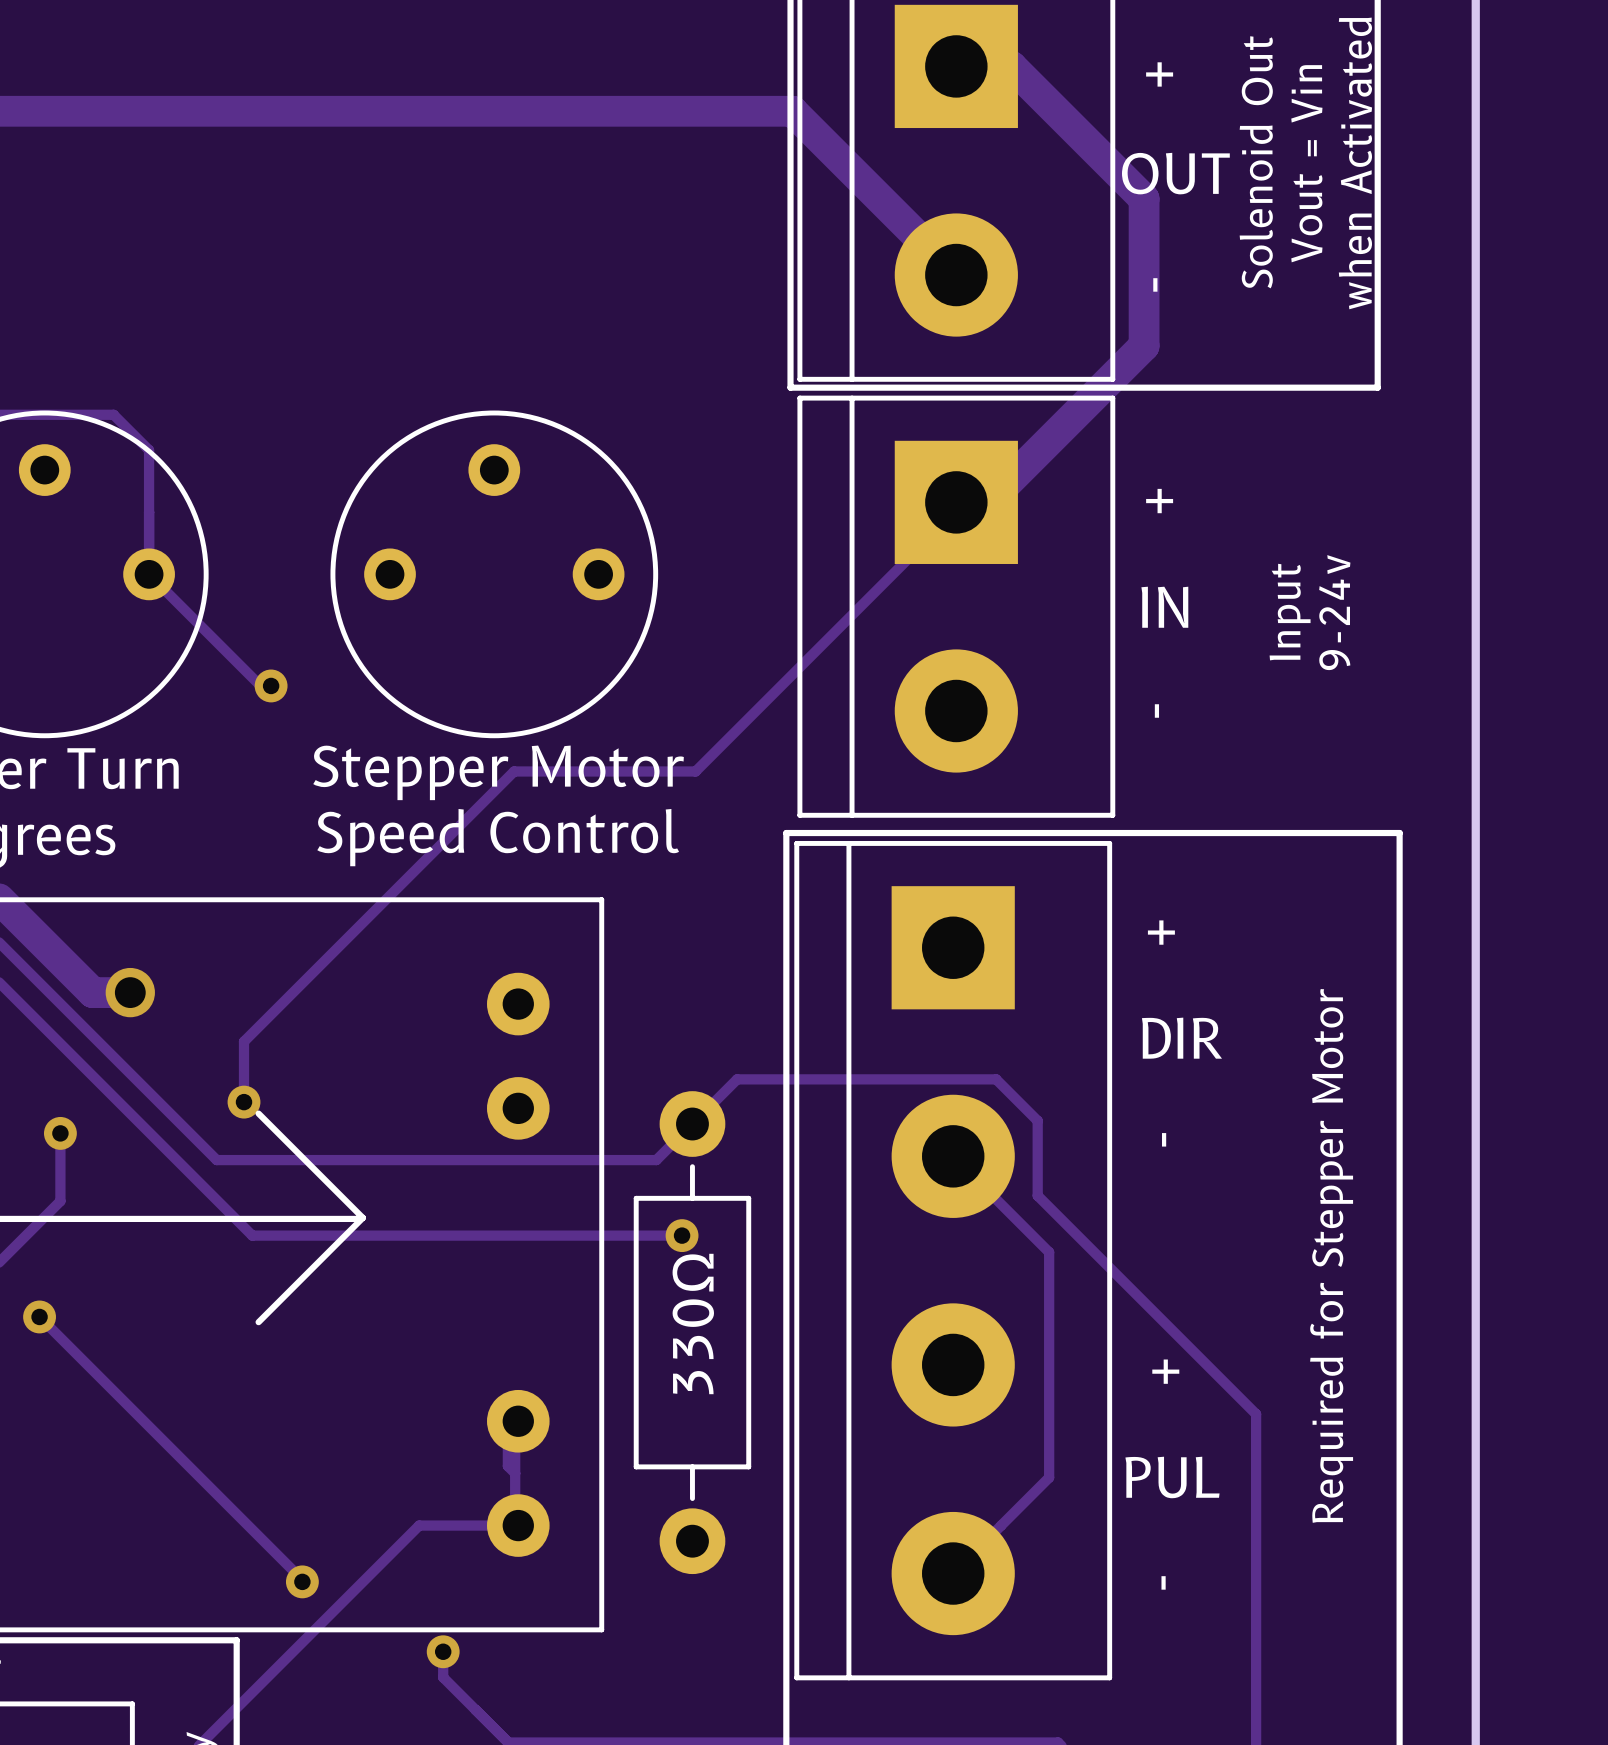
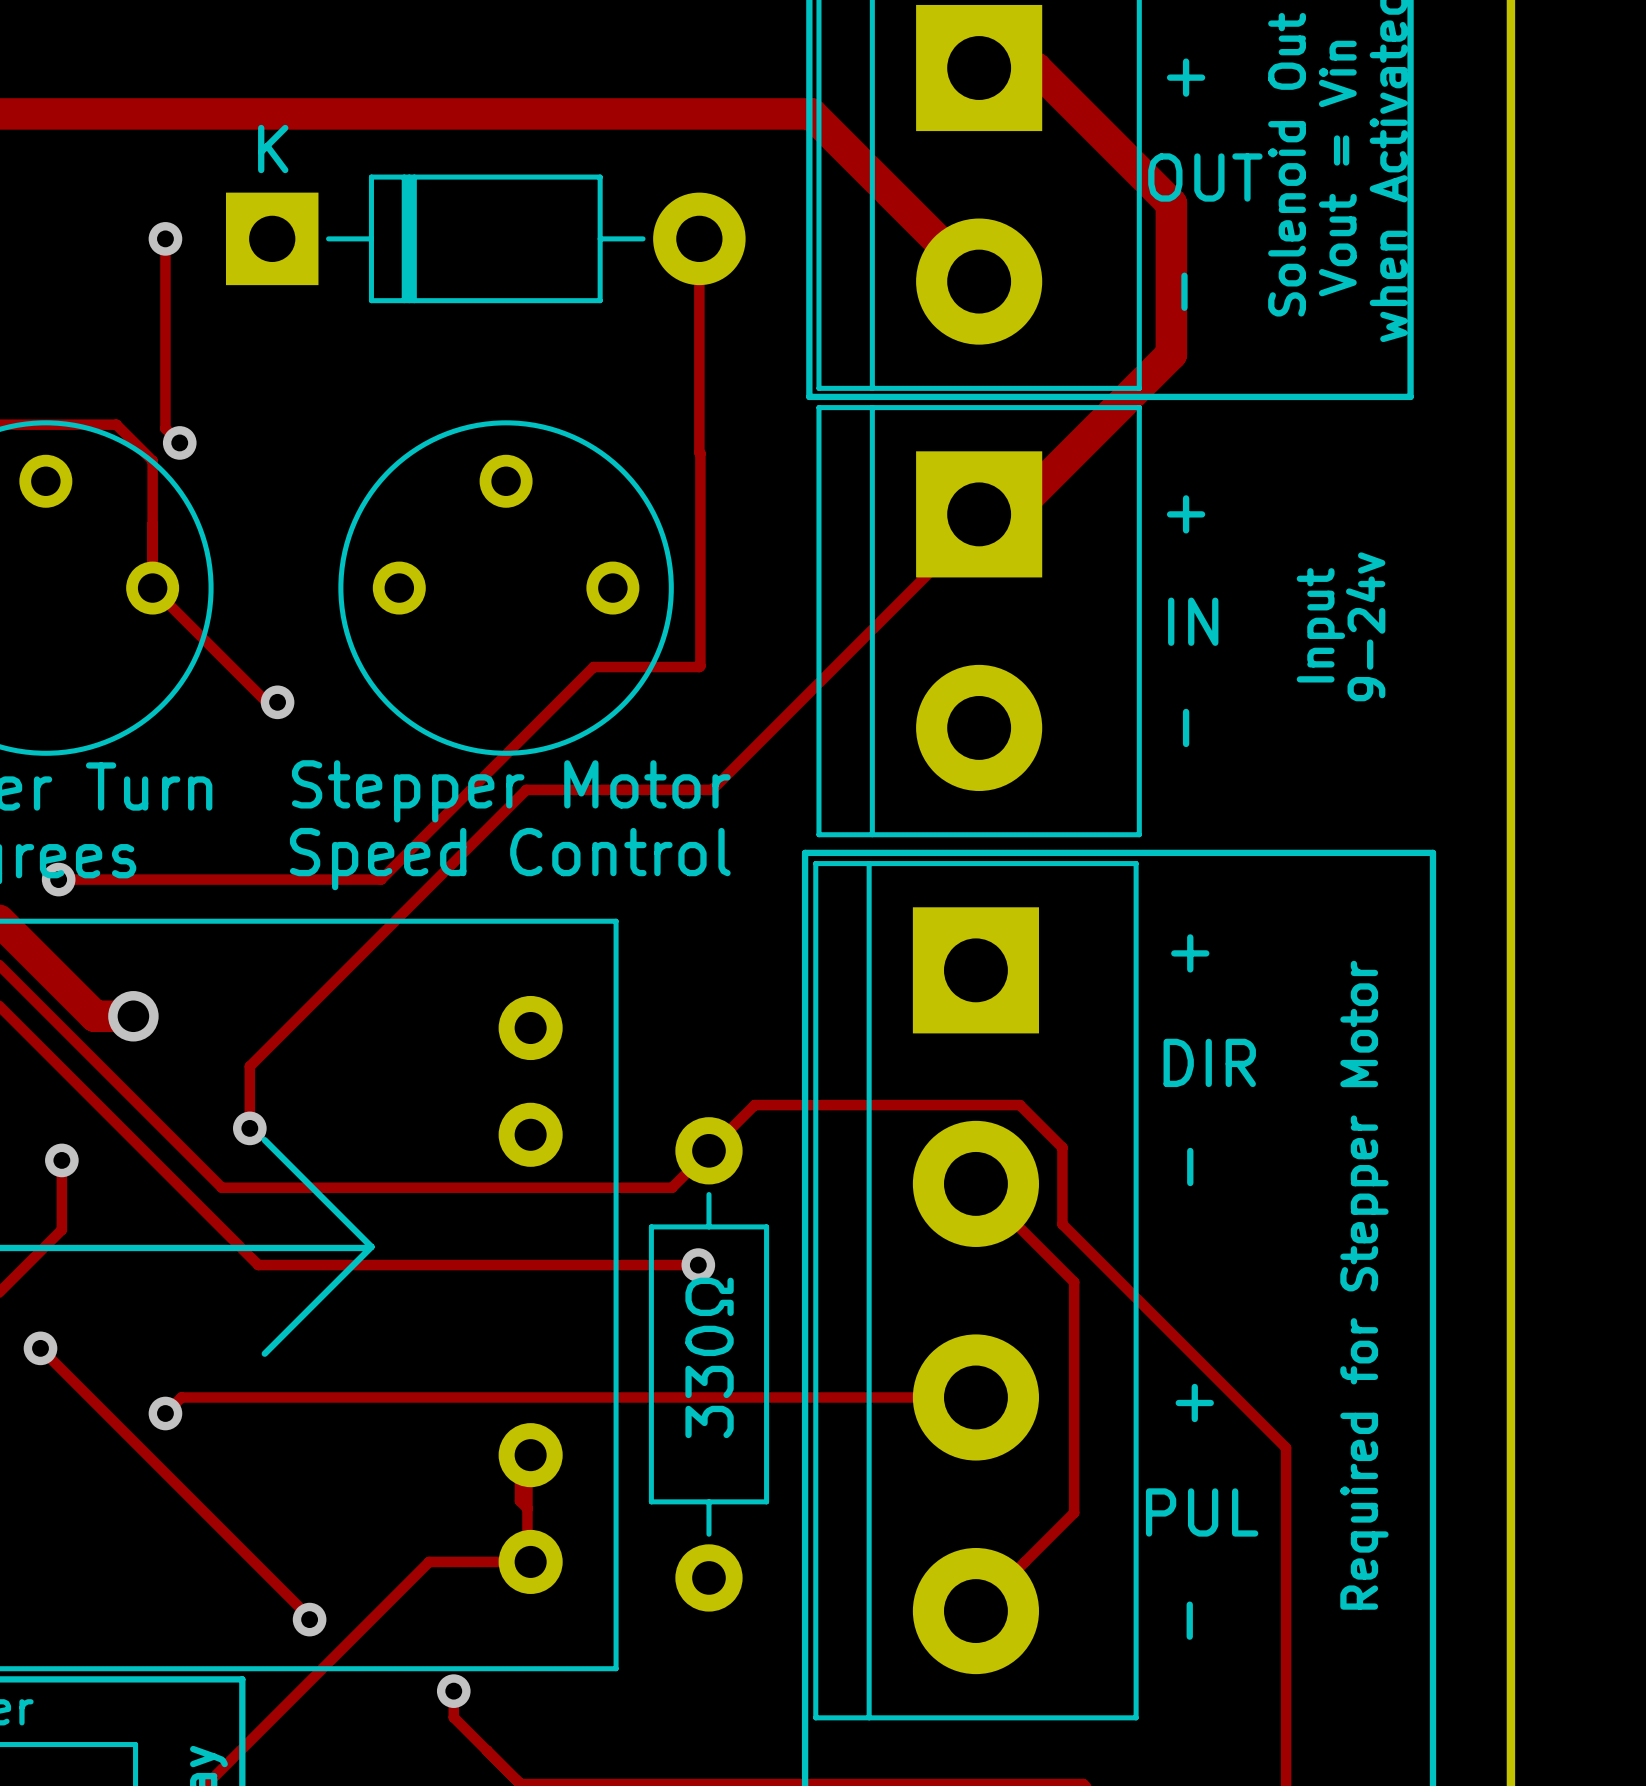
track: none -> (165, 238) (165, 428) (179, 442)
via: none -> (165, 238)
part: none -> (485, 238)
track: none -> (699, 238) (700, 666) (593, 667) (381, 879) (58, 879)
via: none -> (179, 442)
via: none -> (58, 879)
track: none -> (975, 1397) (181, 1397) (165, 1413)
via: none -> (165, 1413)

